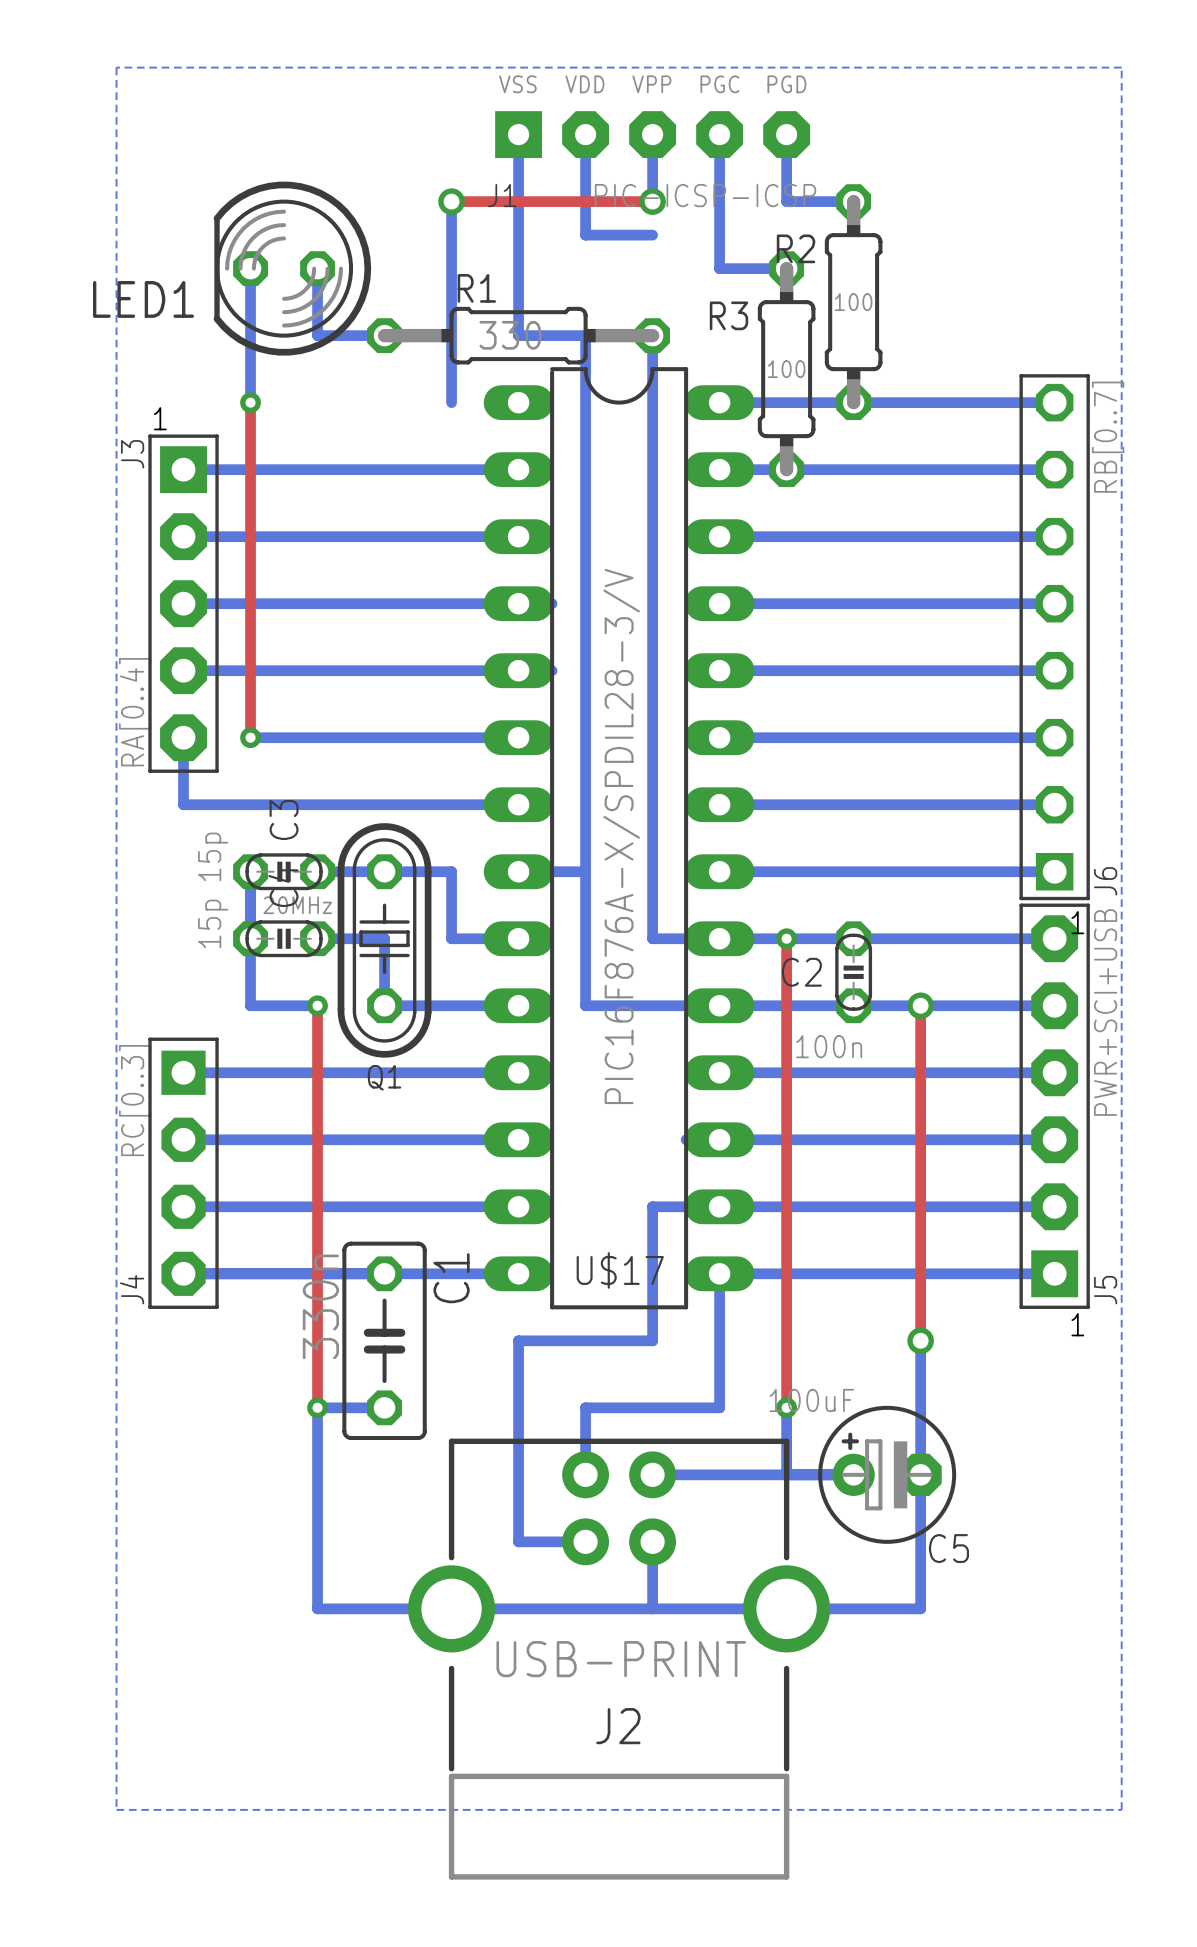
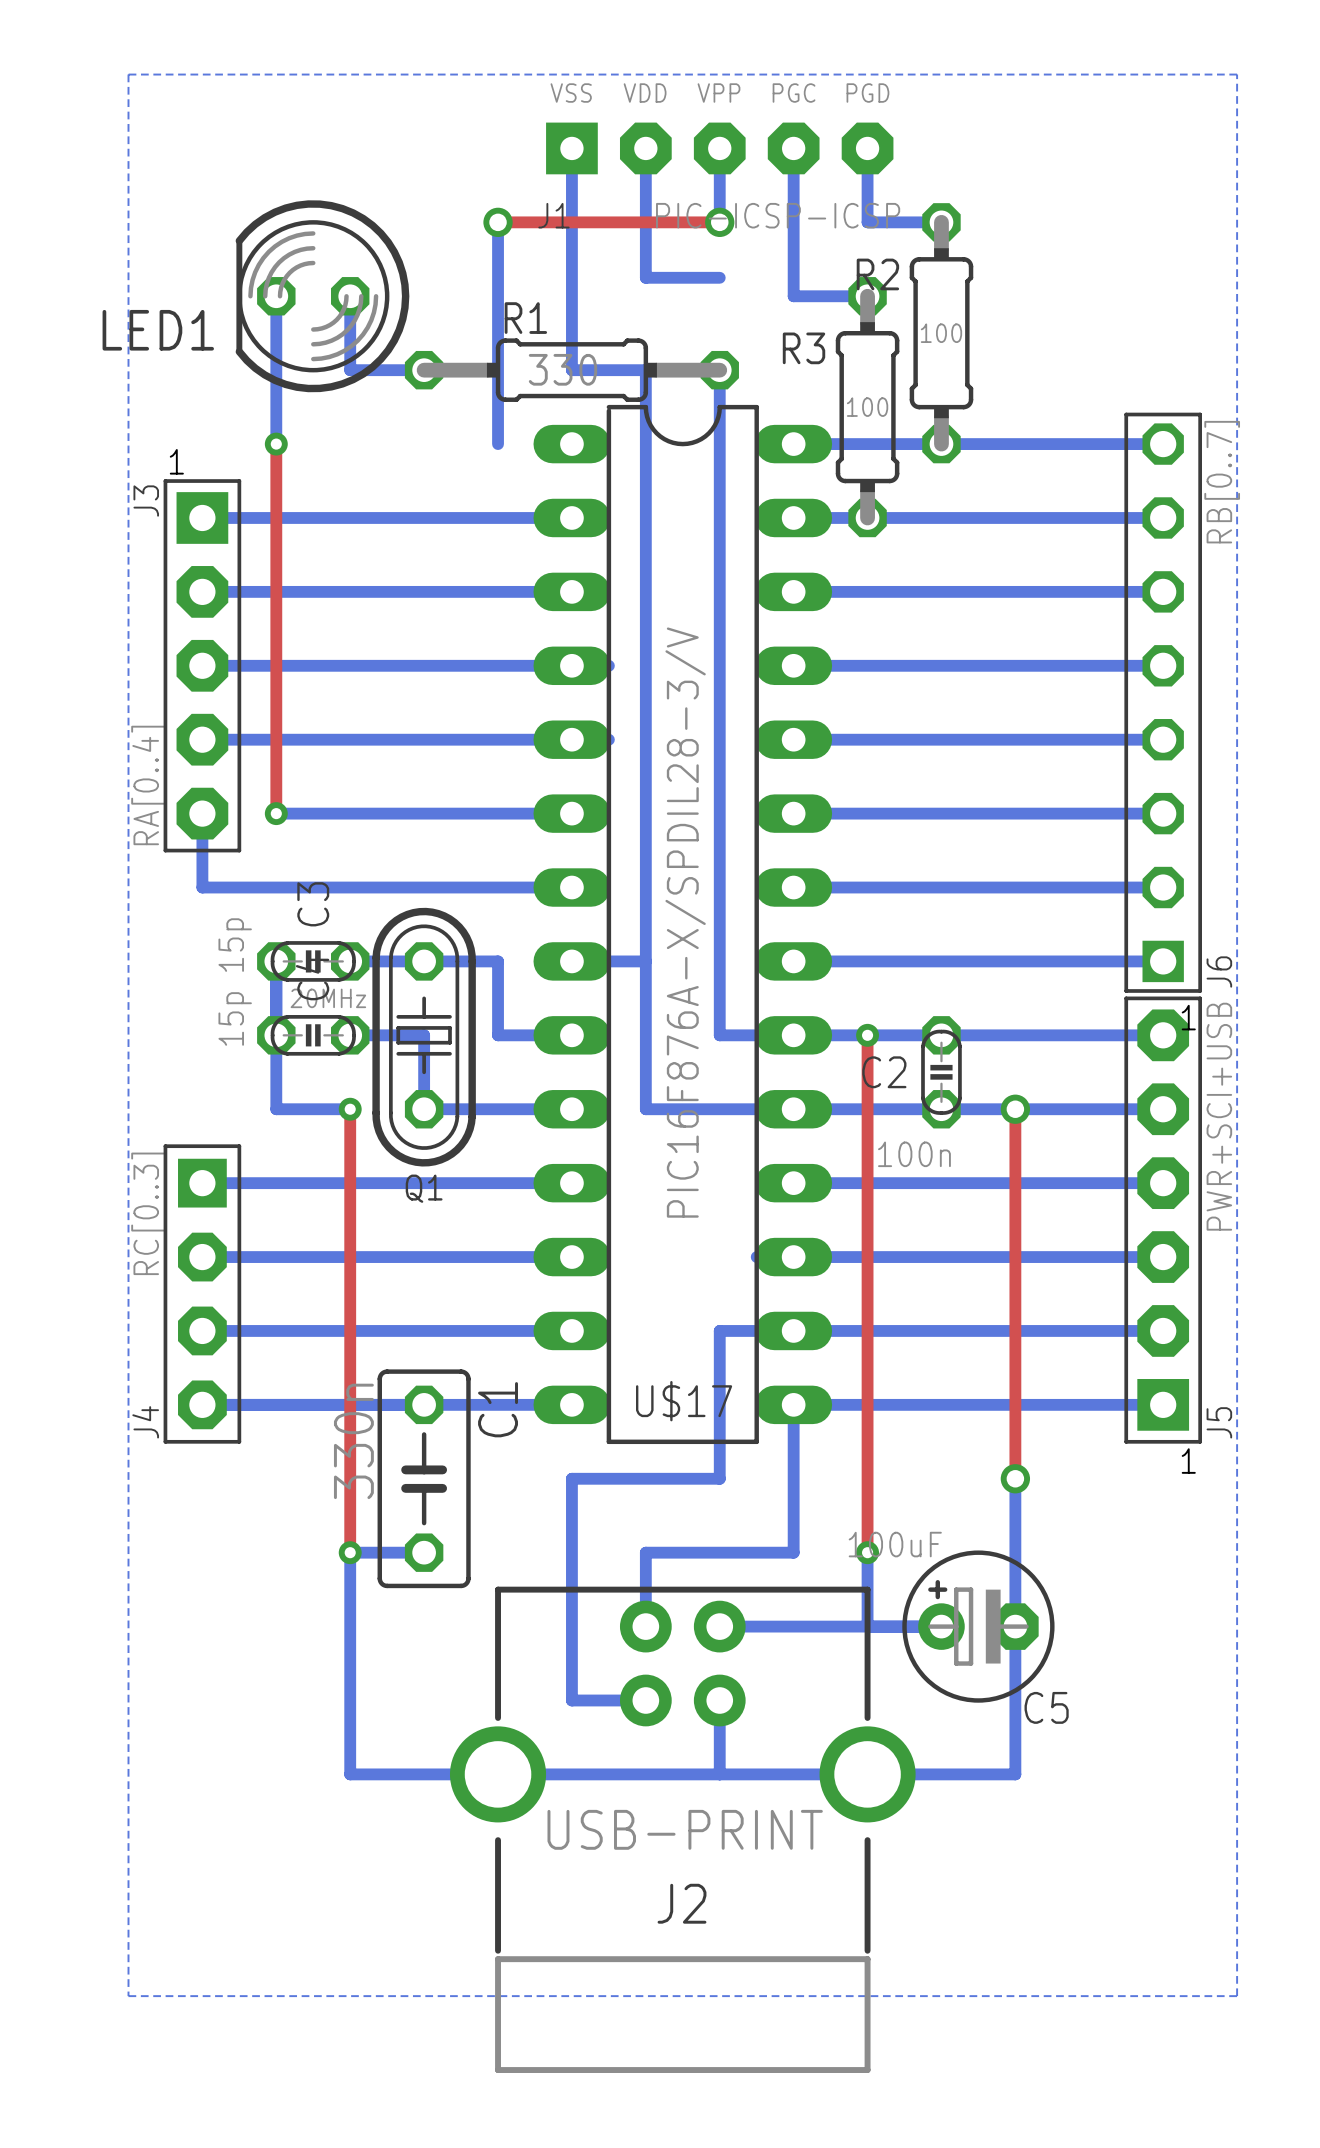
bottom track: (585, 235) (652, 235) -> (645, 259) (645, 277) (719, 277)

